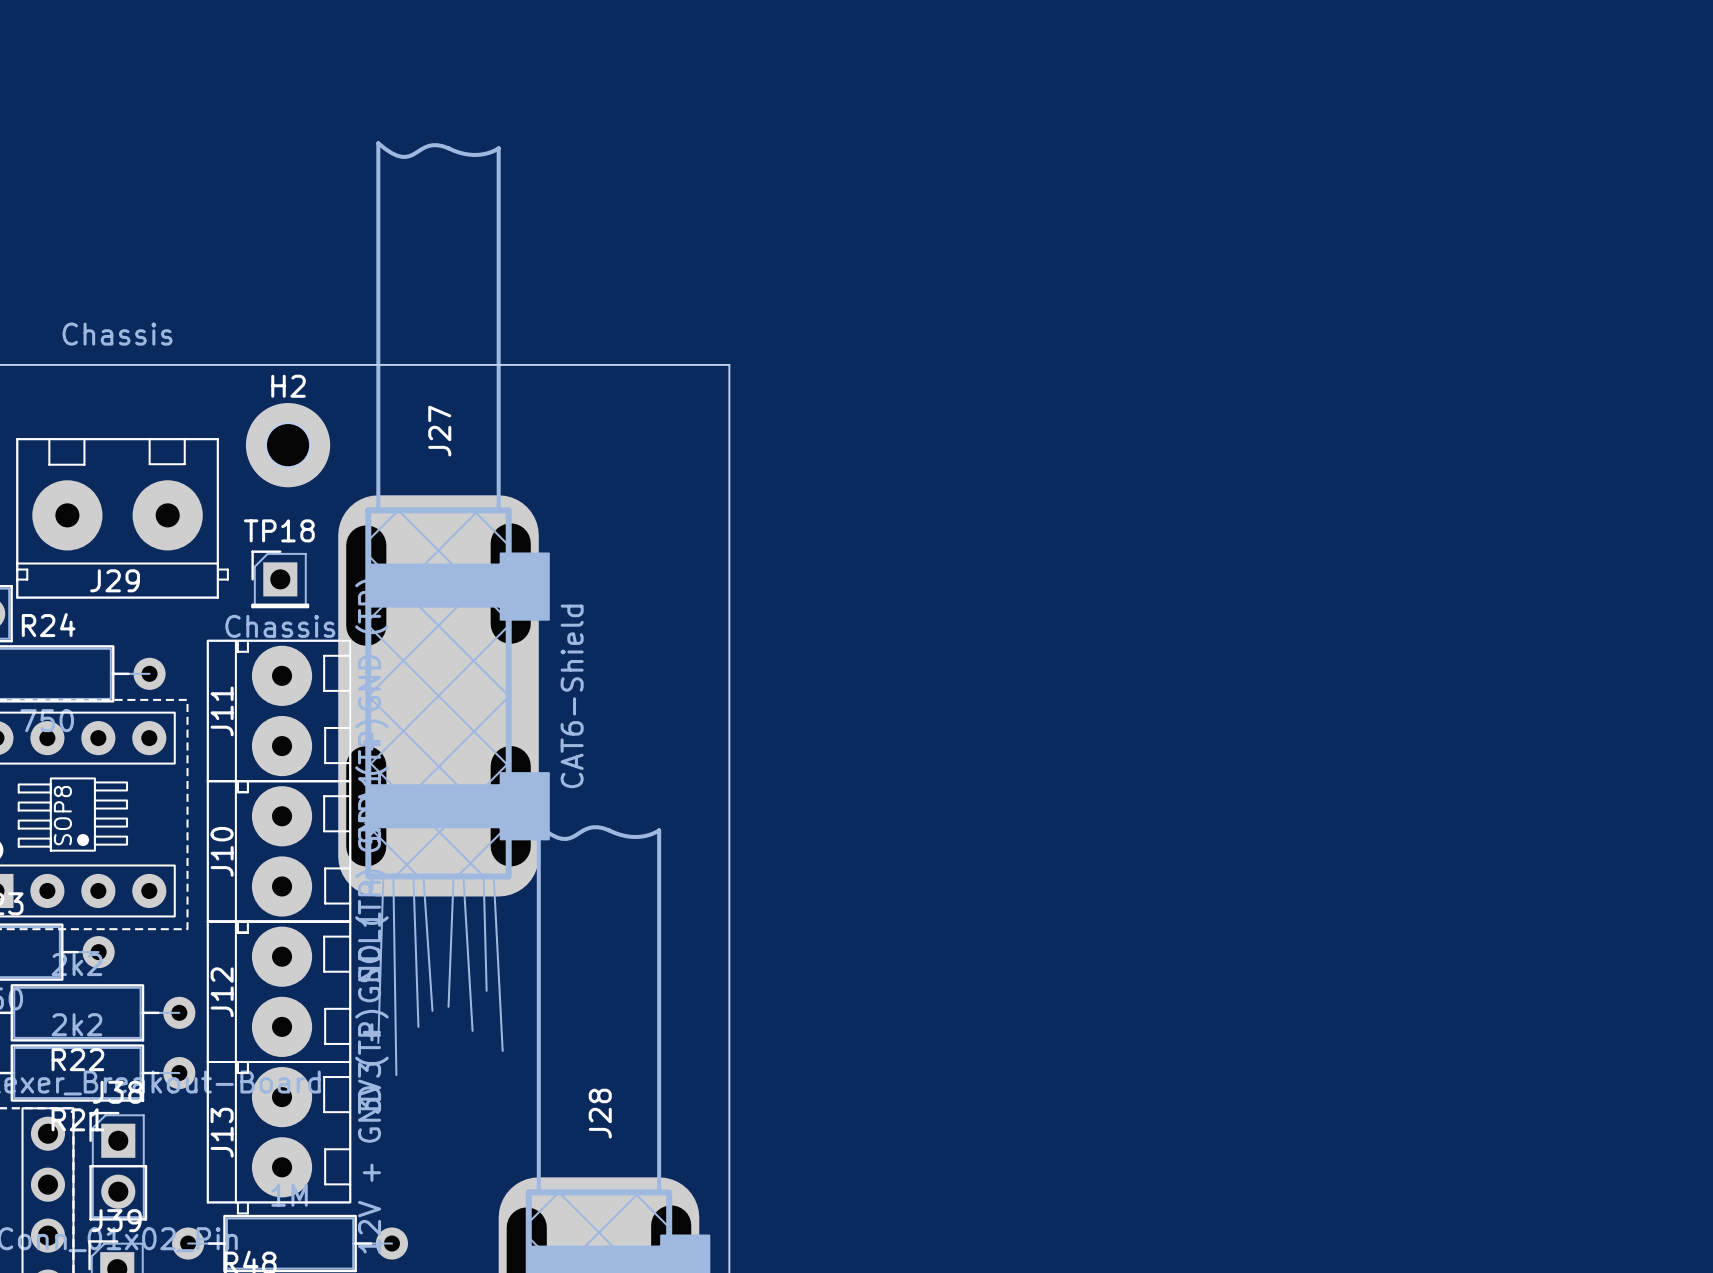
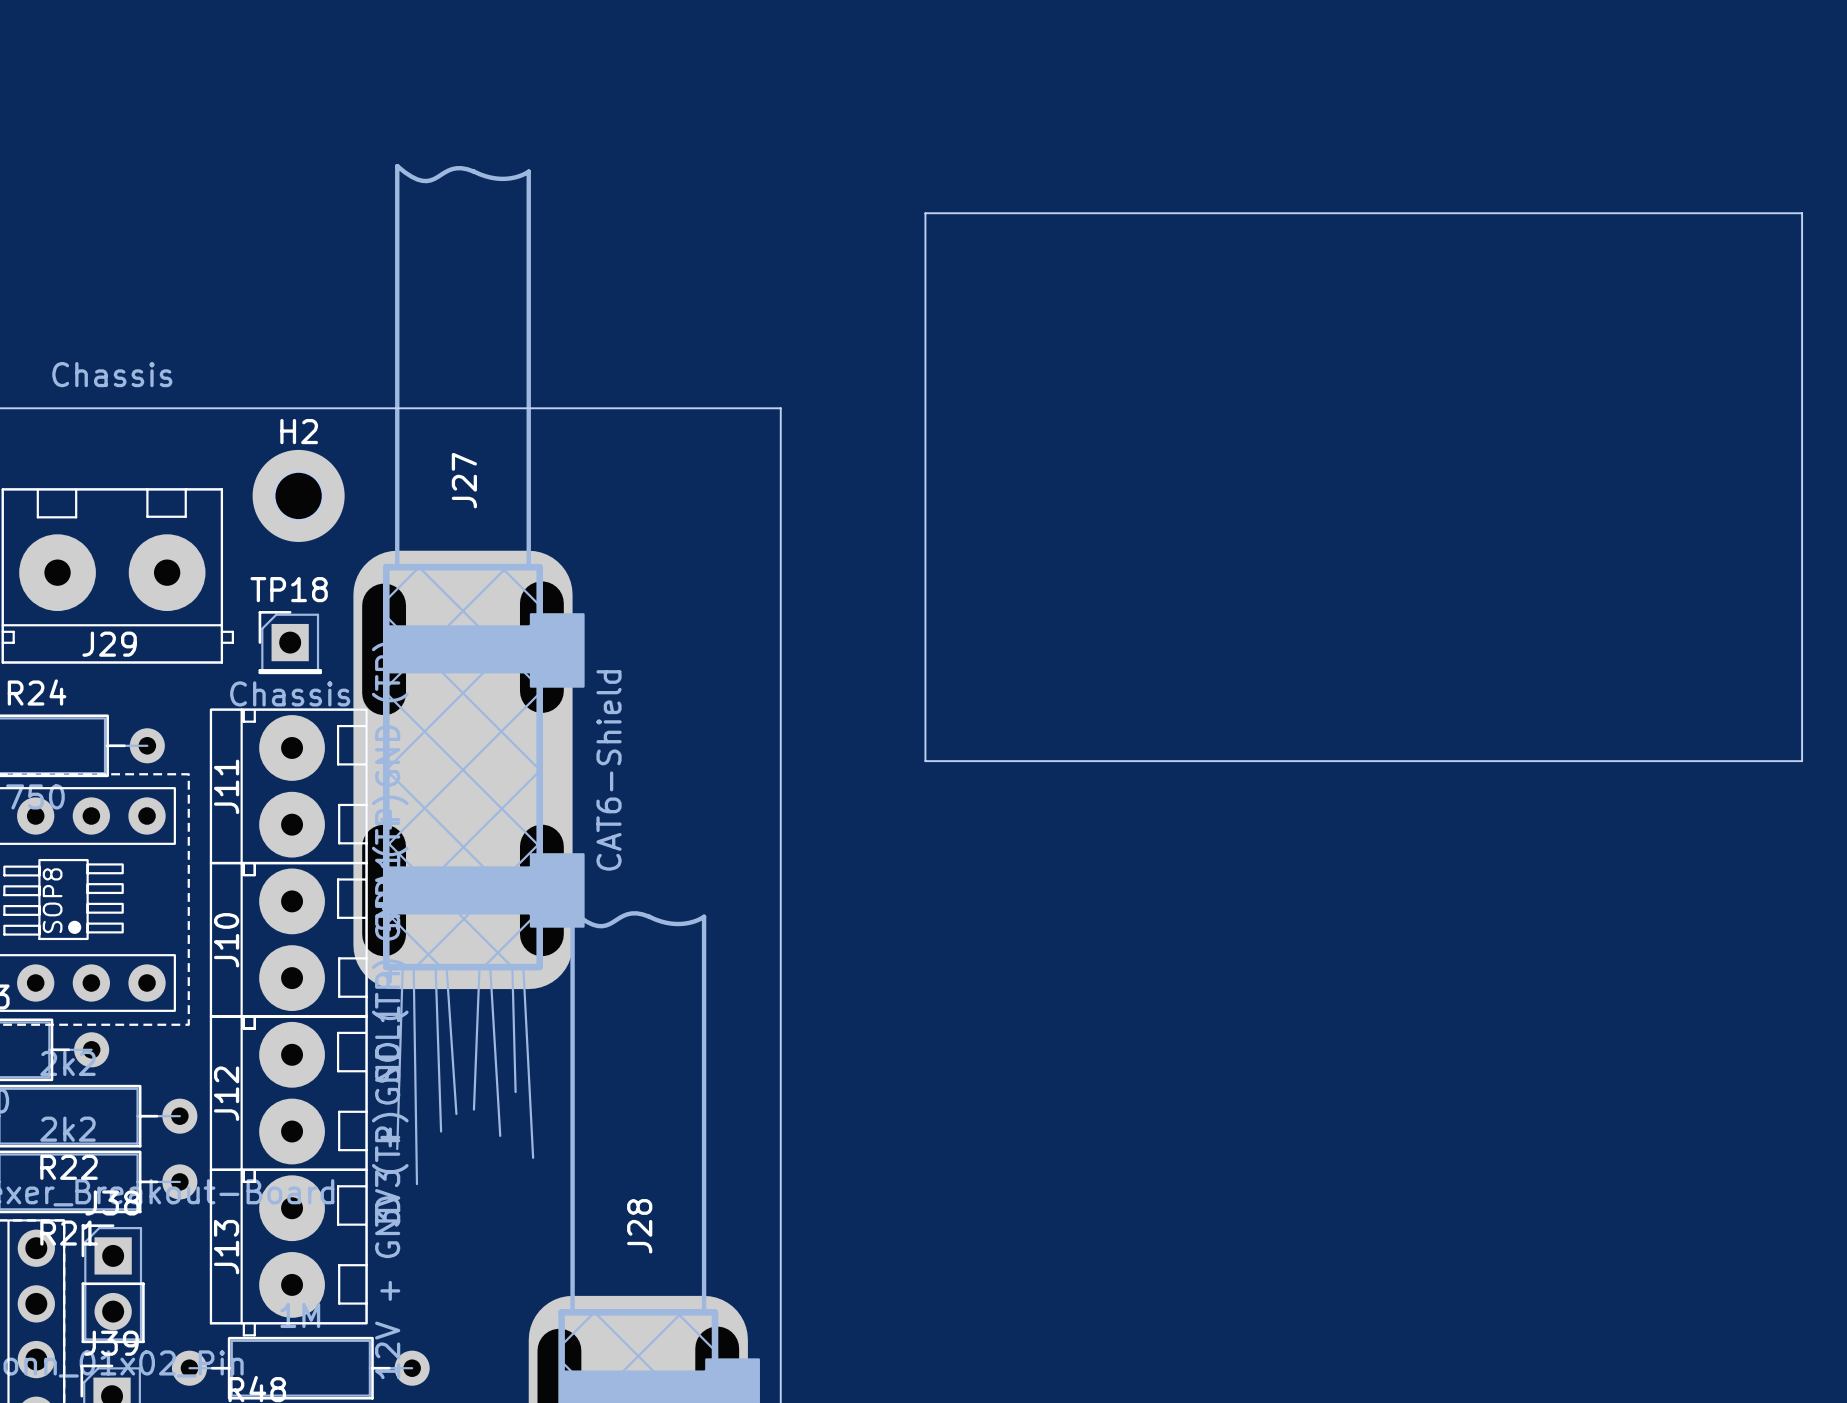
board edge: none -> (925, 213) (1802, 213) (1802, 761) (925, 761) (925, 213)

